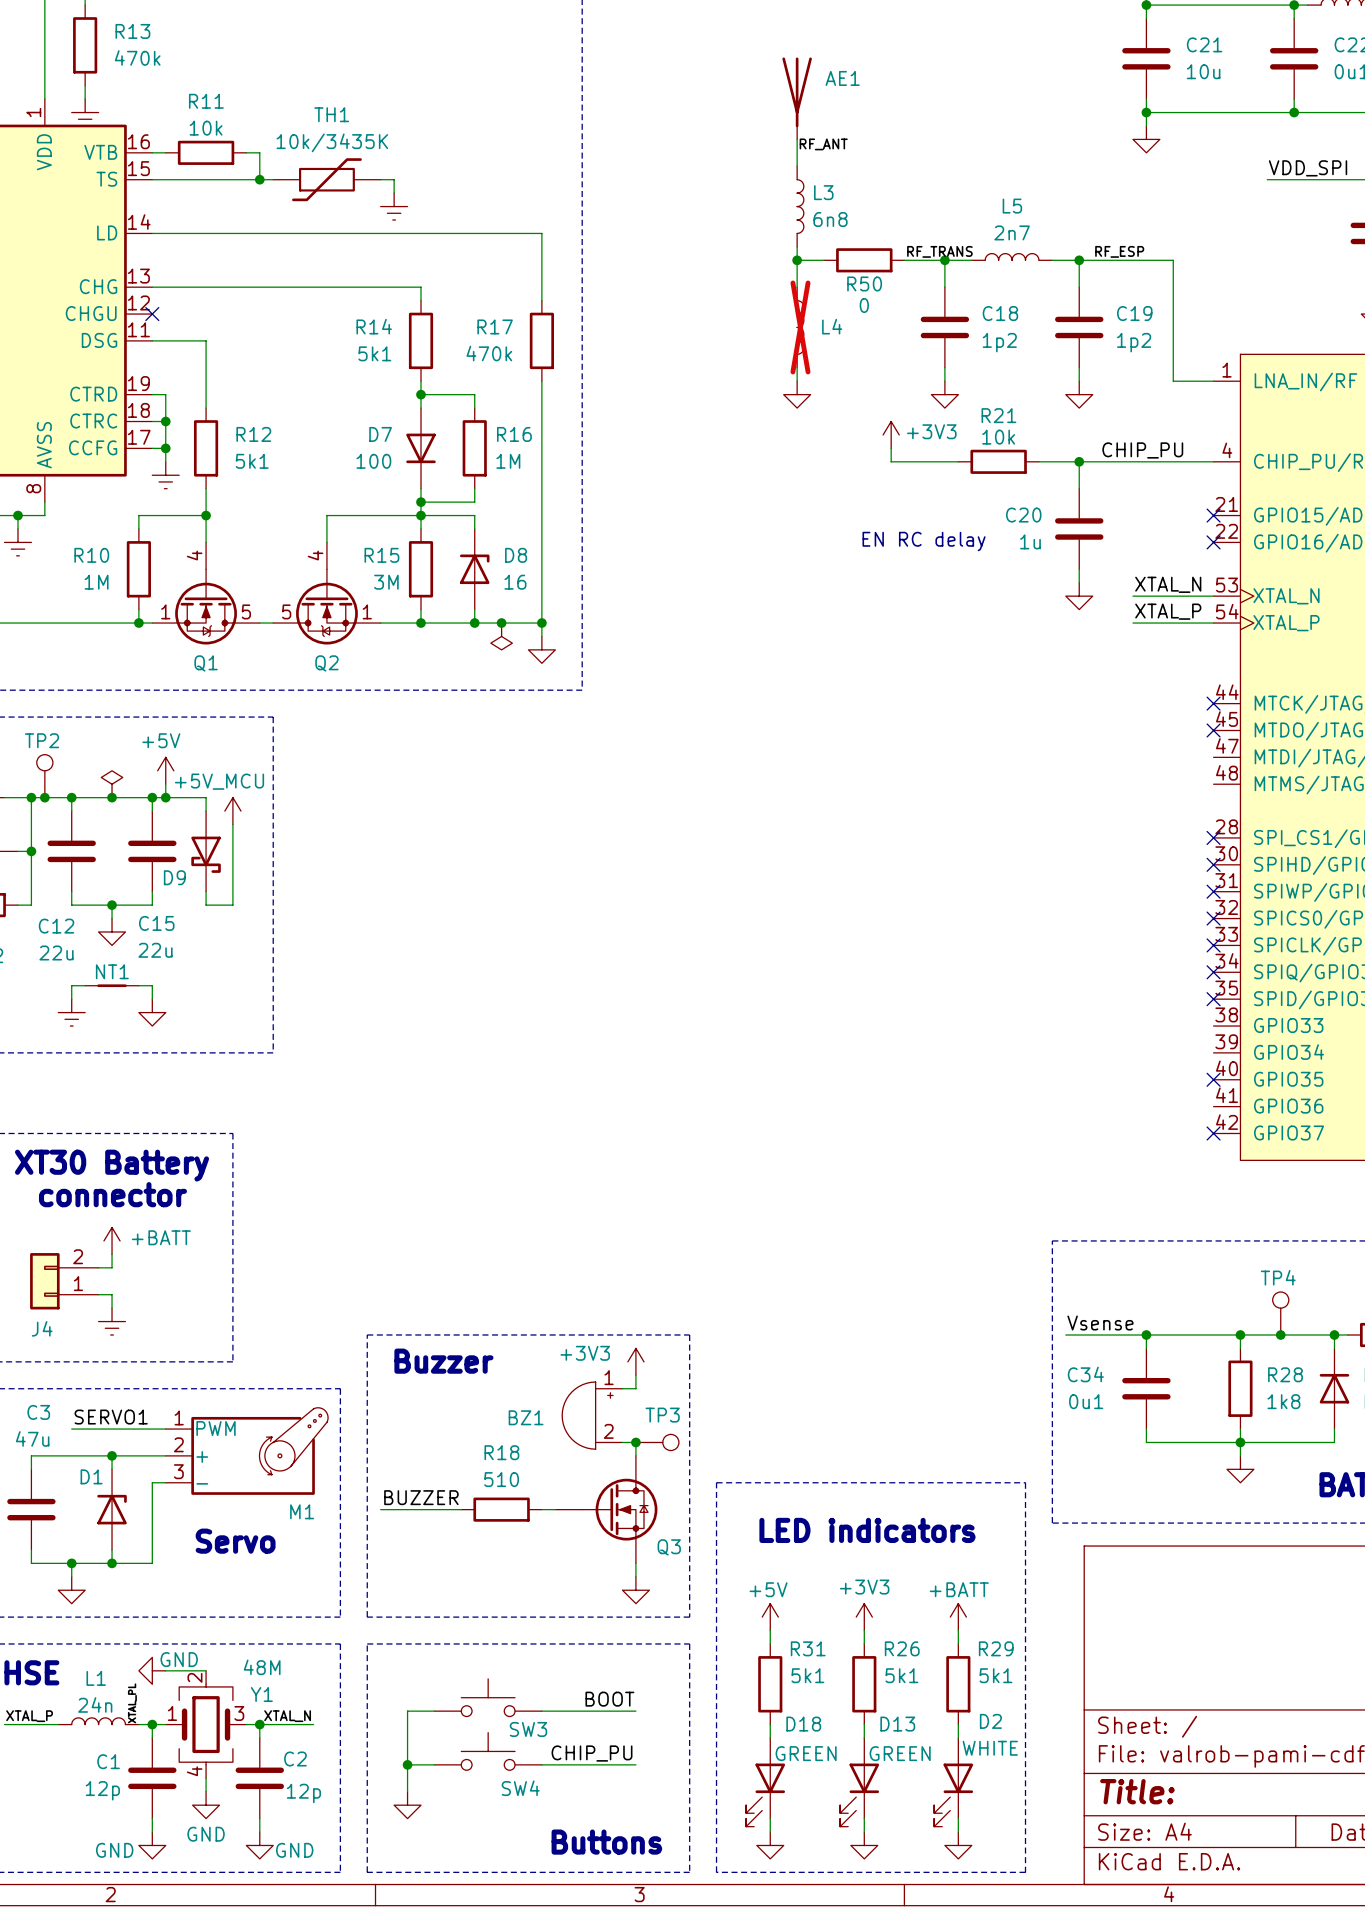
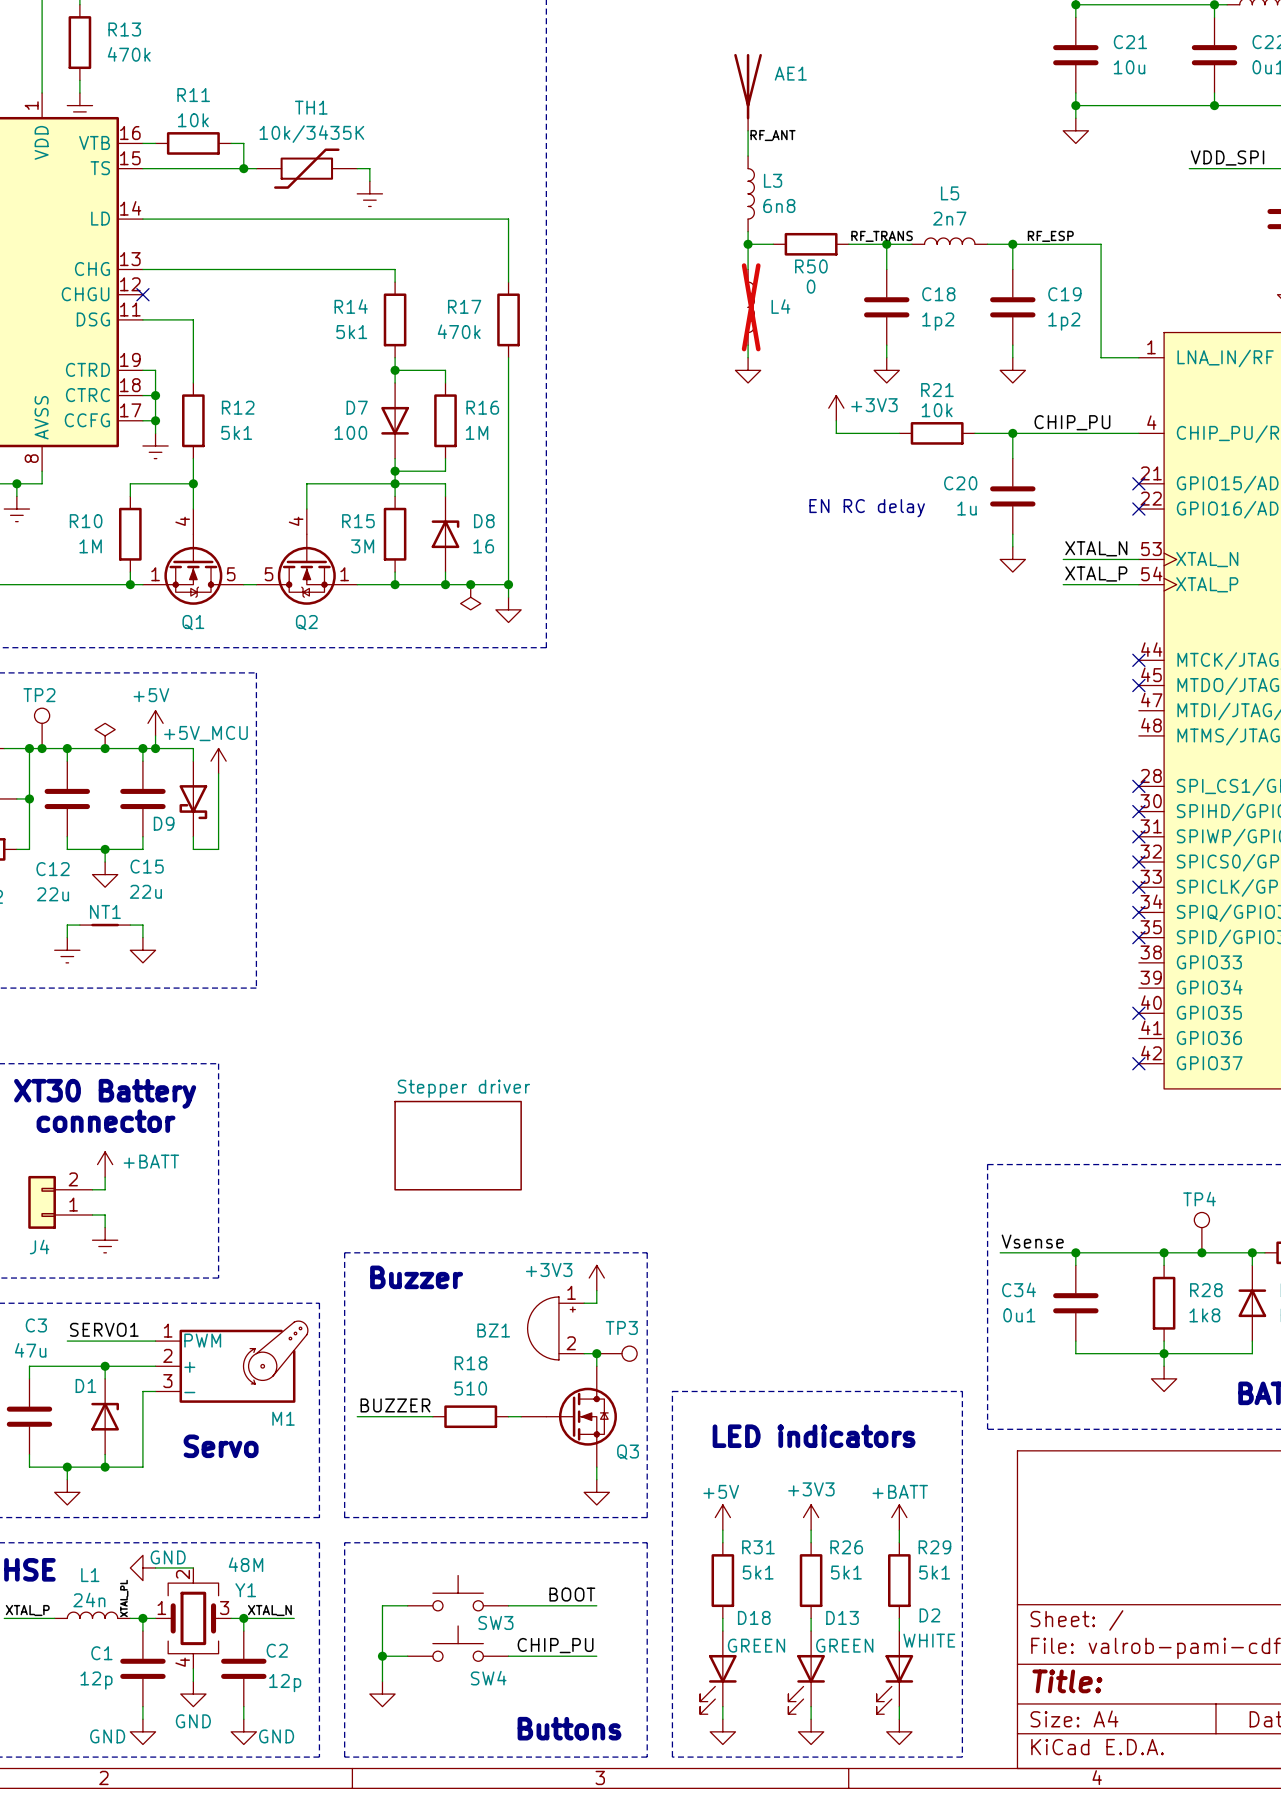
sheet Stepper driver: none -> (458, 1145)

